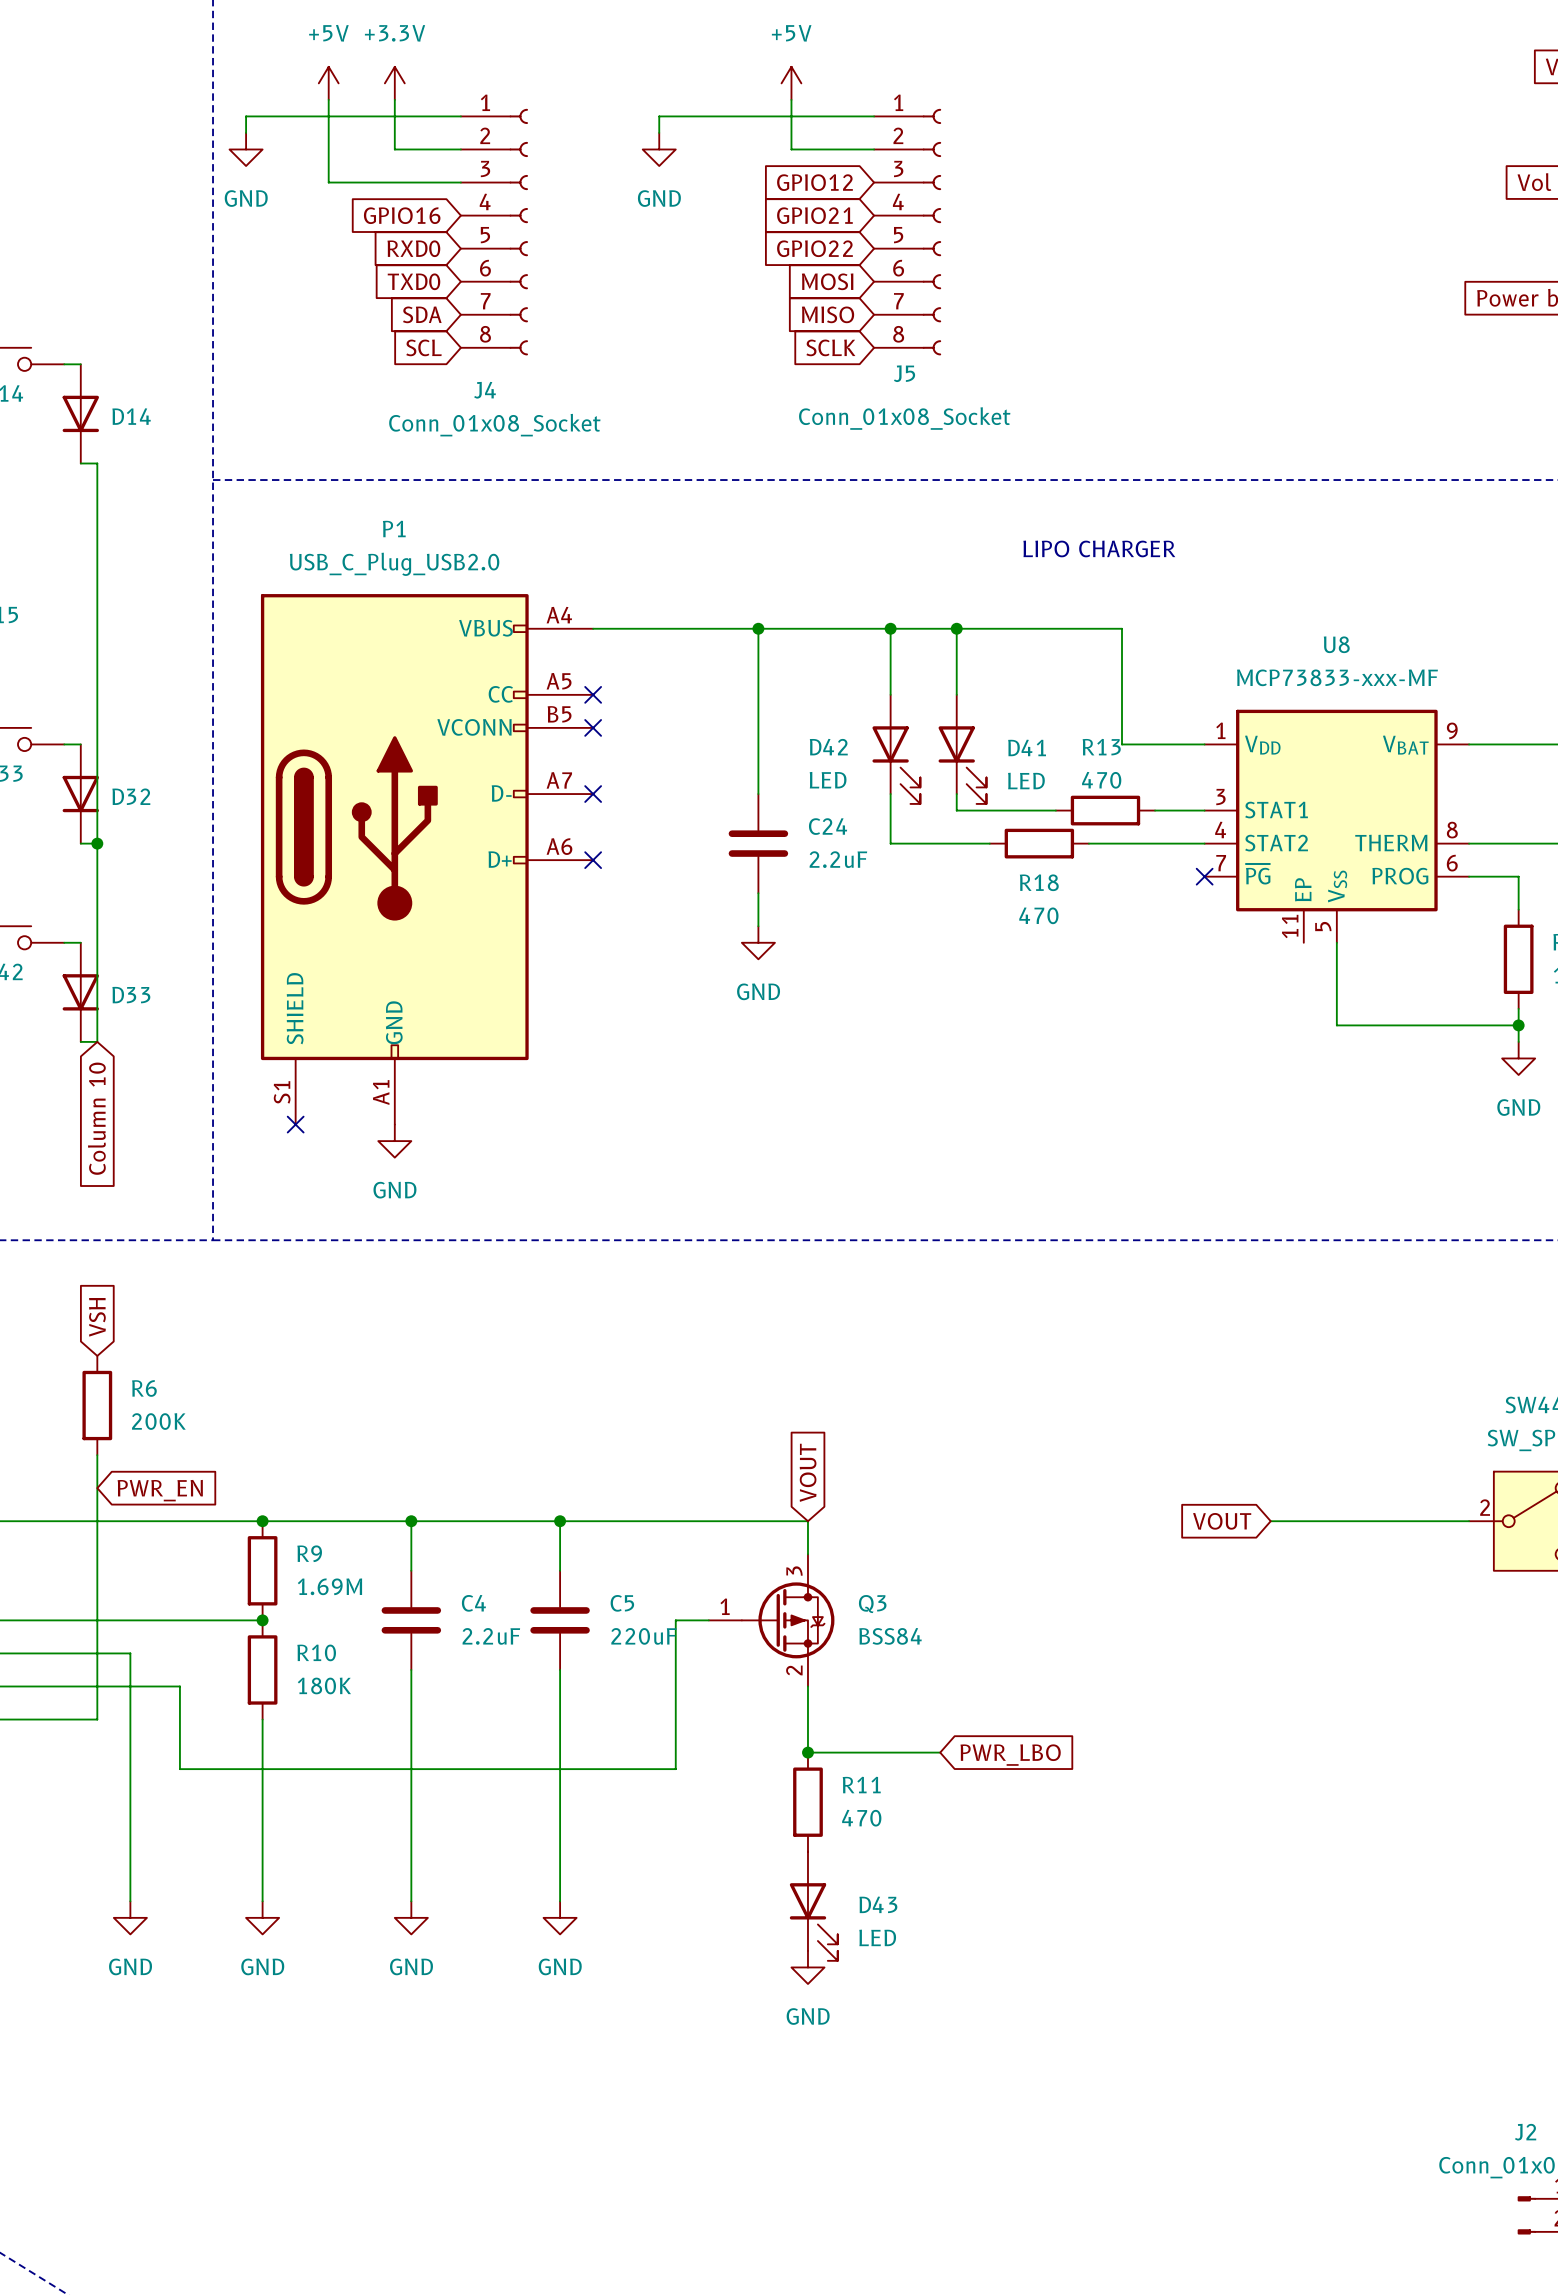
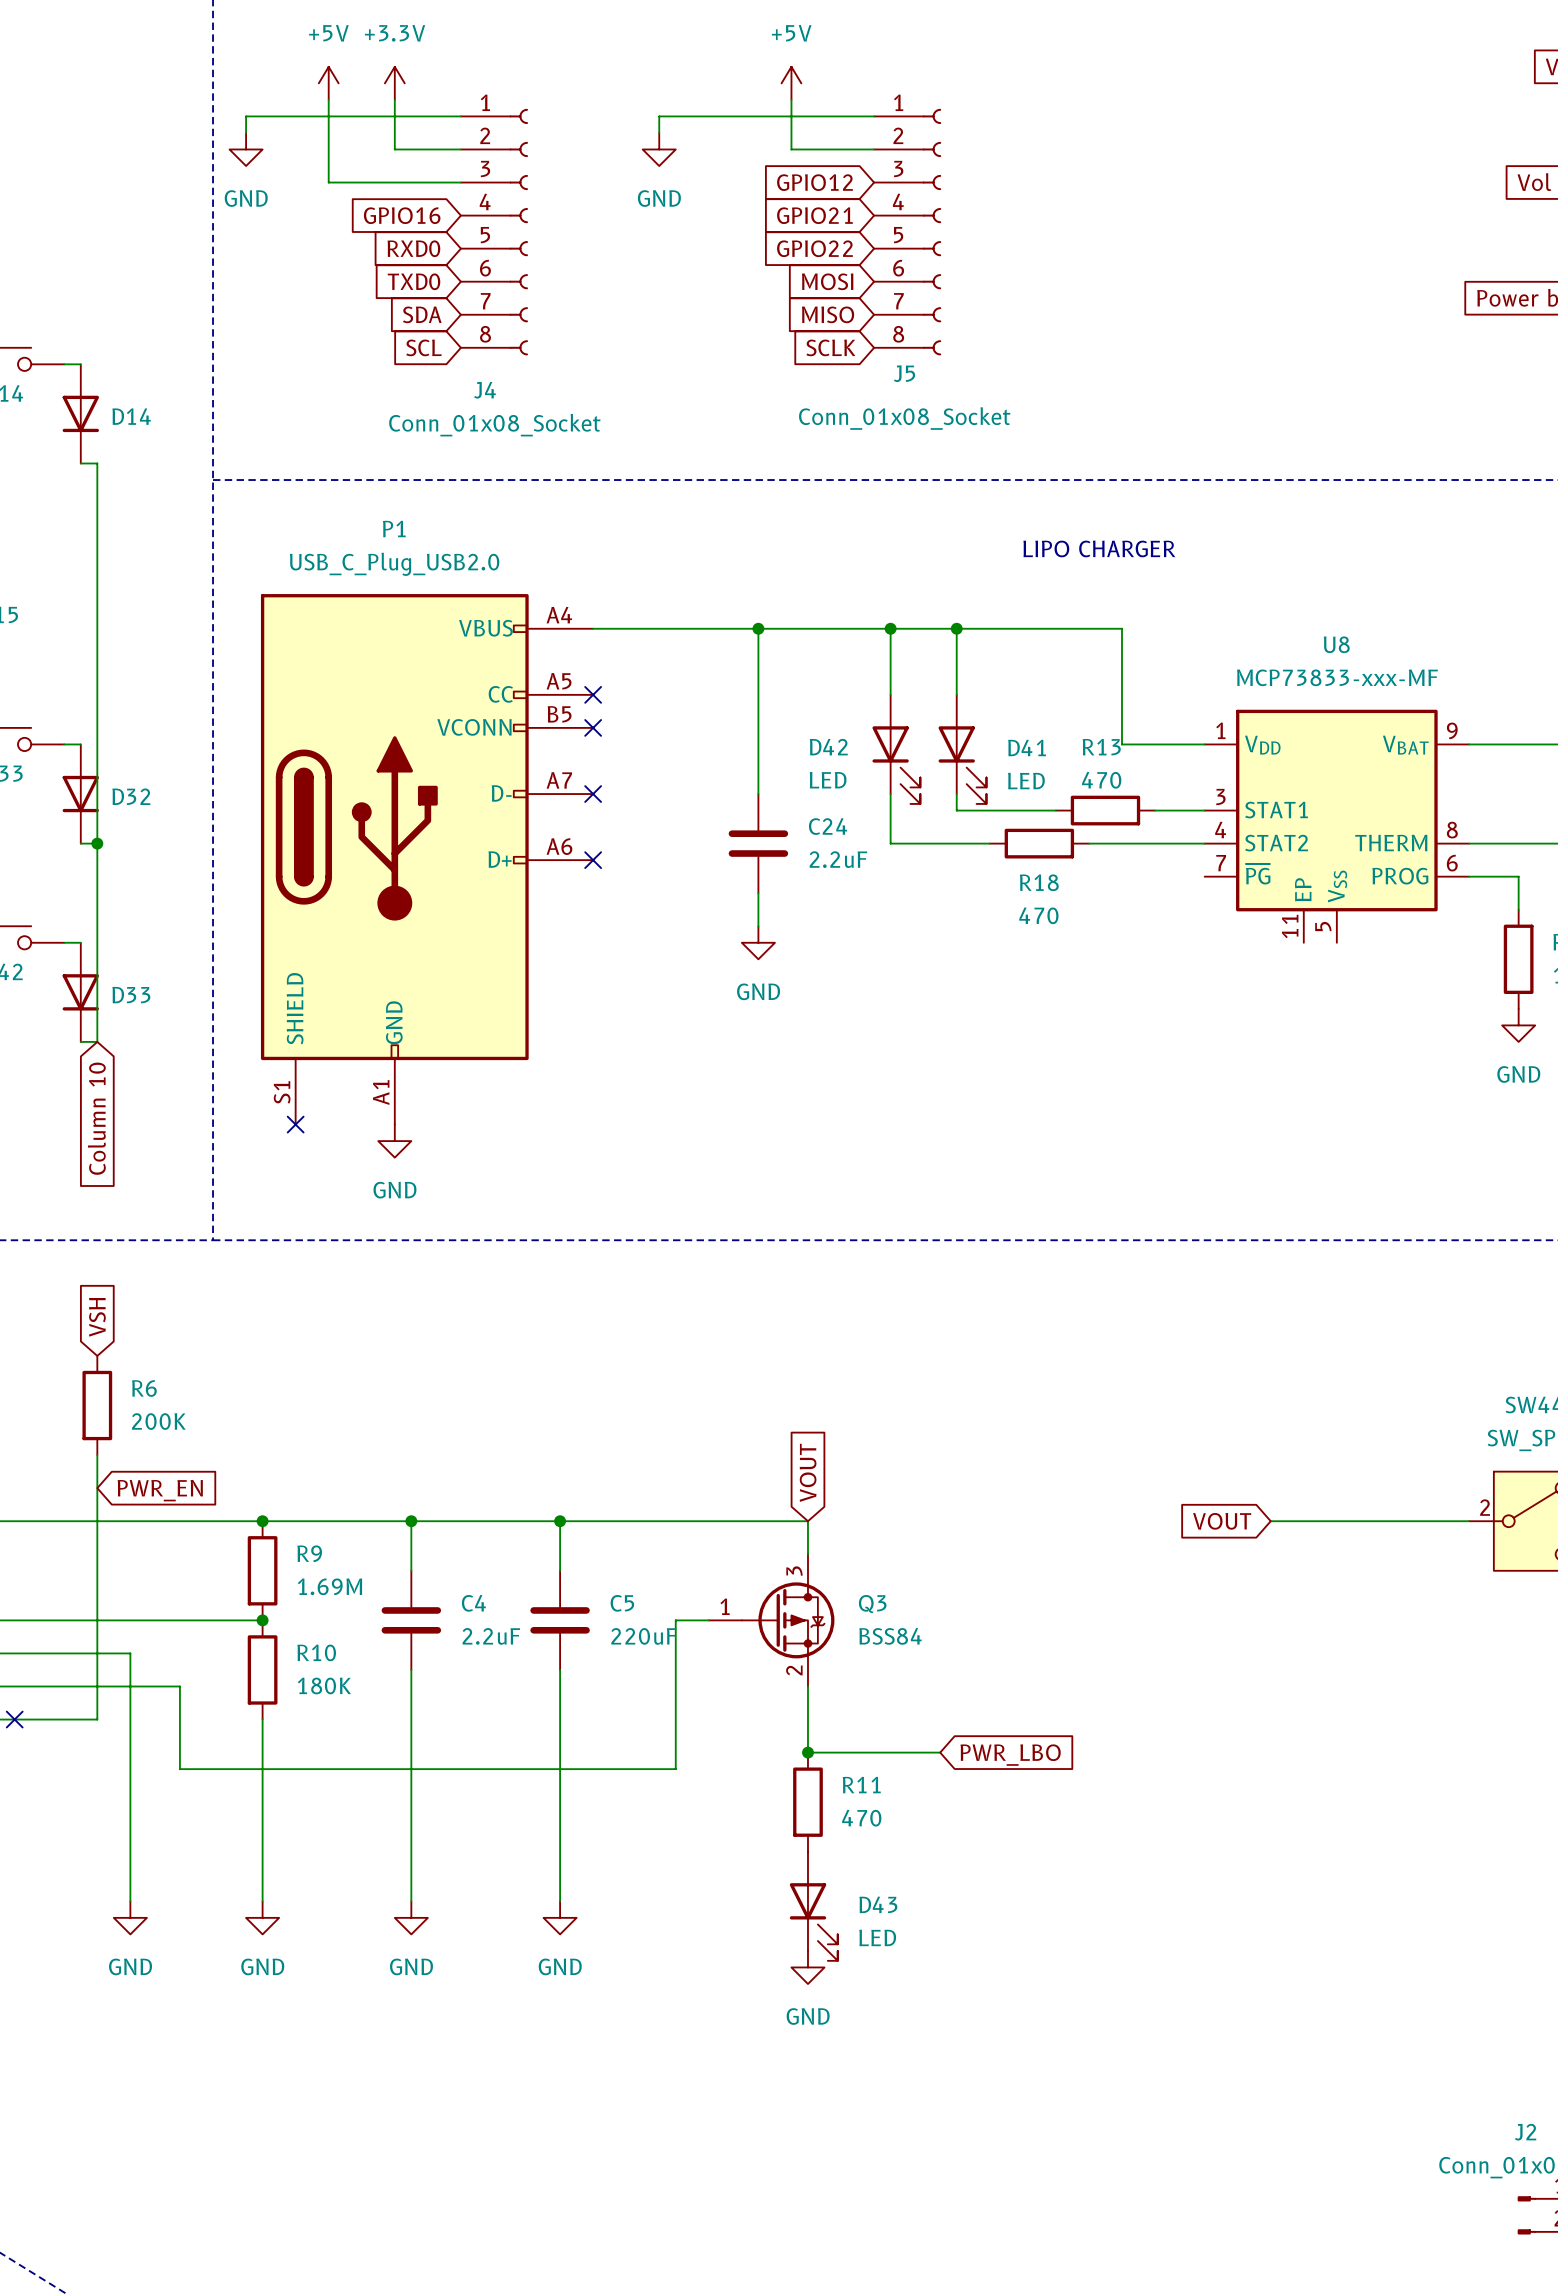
no-connect mark: (1204, 876) -> none
wire: (1336, 942) (1336, 1025) (1518, 1025) -> none
junction: (1518, 1025) -> none
power symbol position: GND (1518, 1058) -> GND (1518, 1025)
no-connect mark: none -> (14, 1719)

